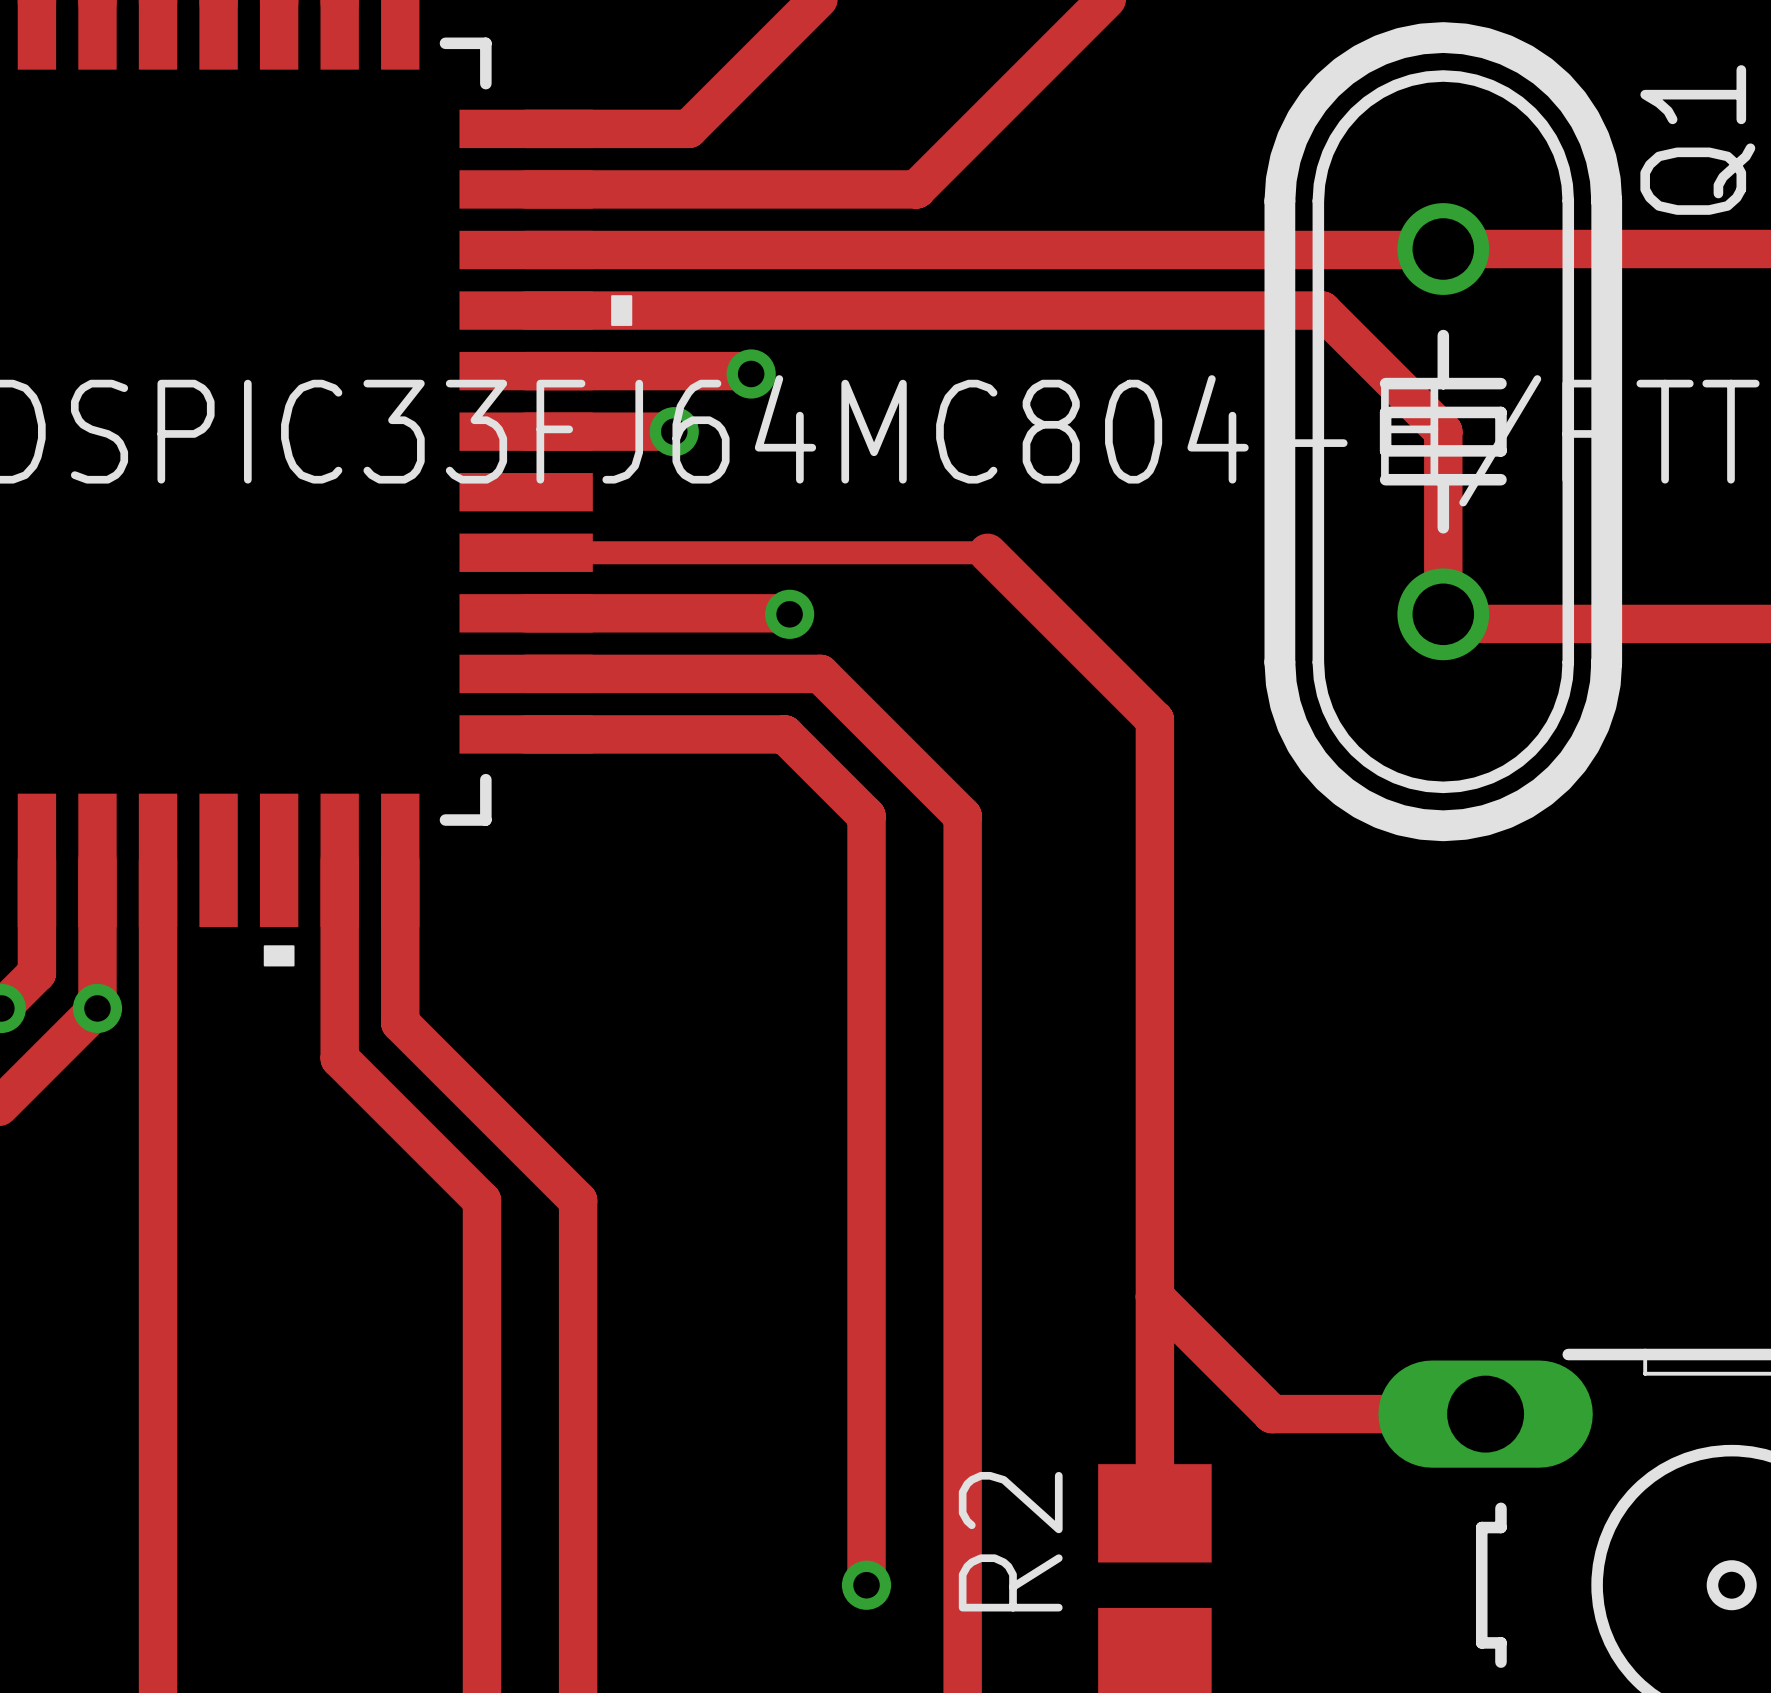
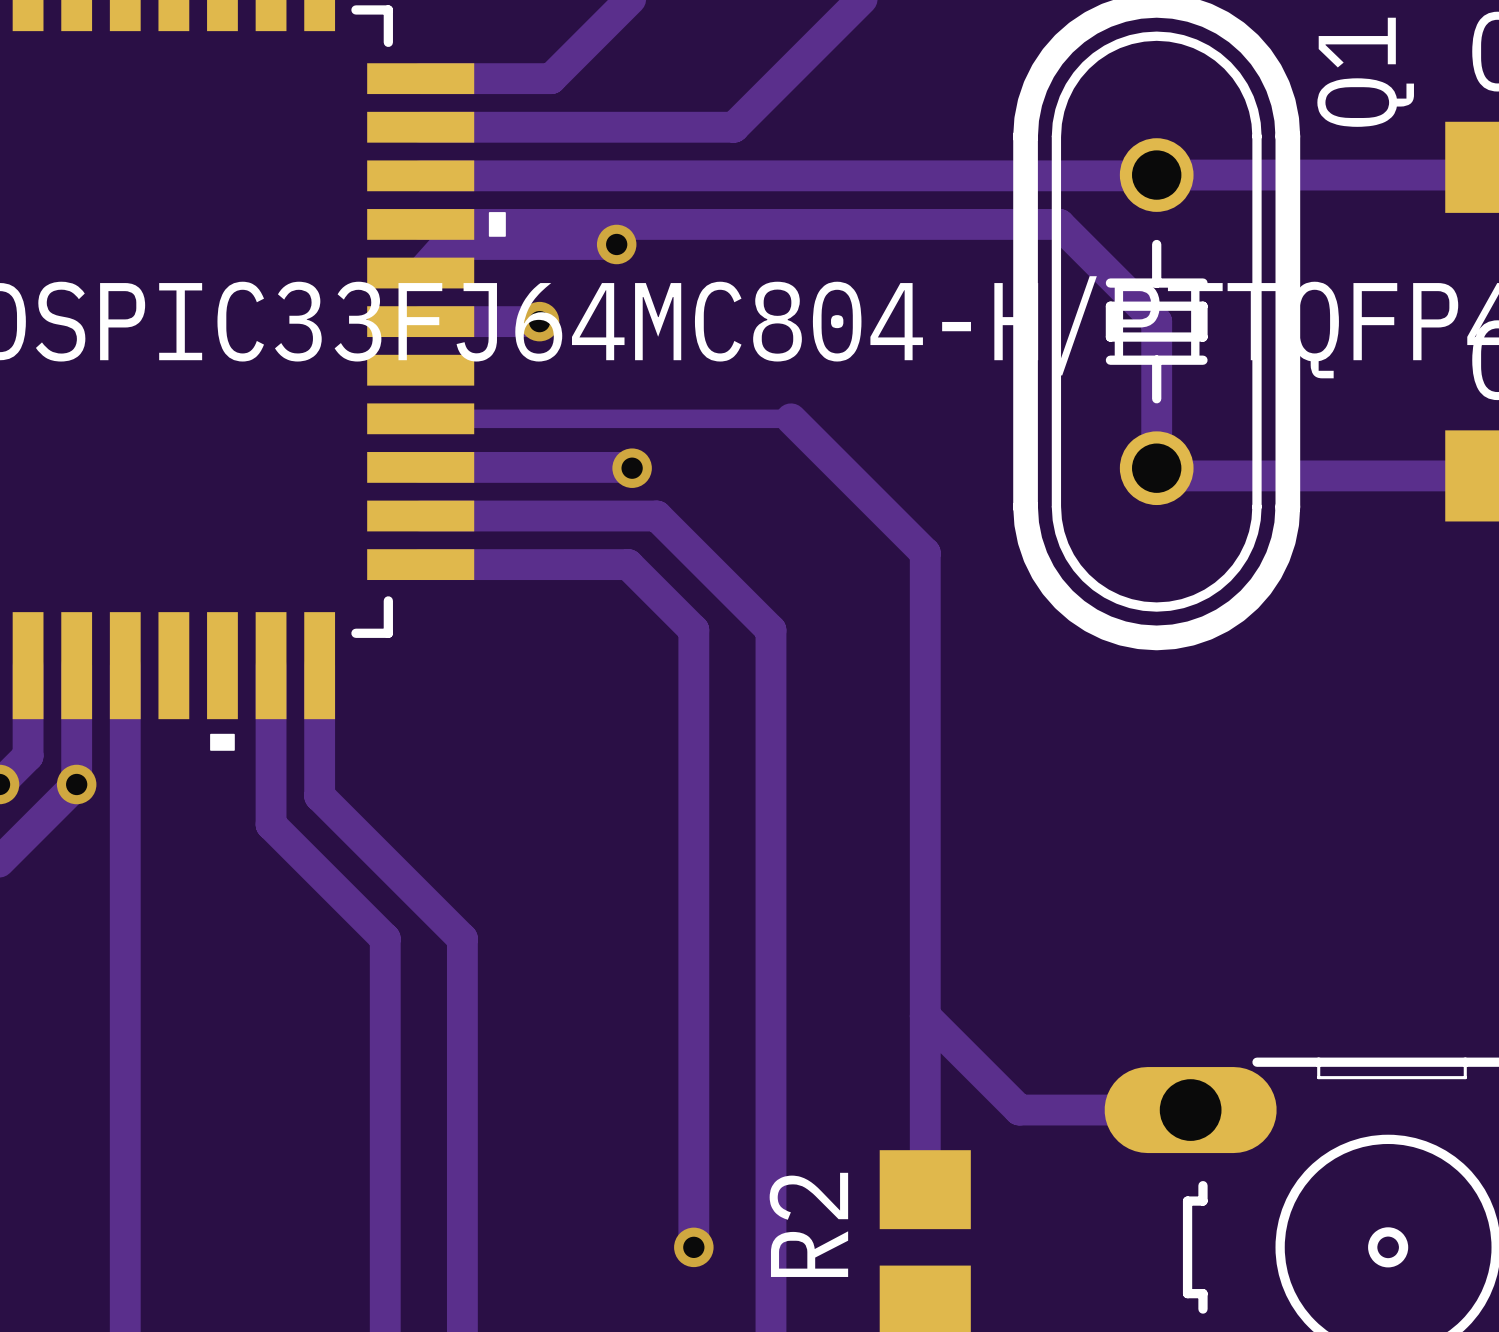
track: (526, 371) (748, 371) (751, 373) -> (420, 273) (446, 244) (616, 244)
via position: (751, 373) -> (616, 244)

